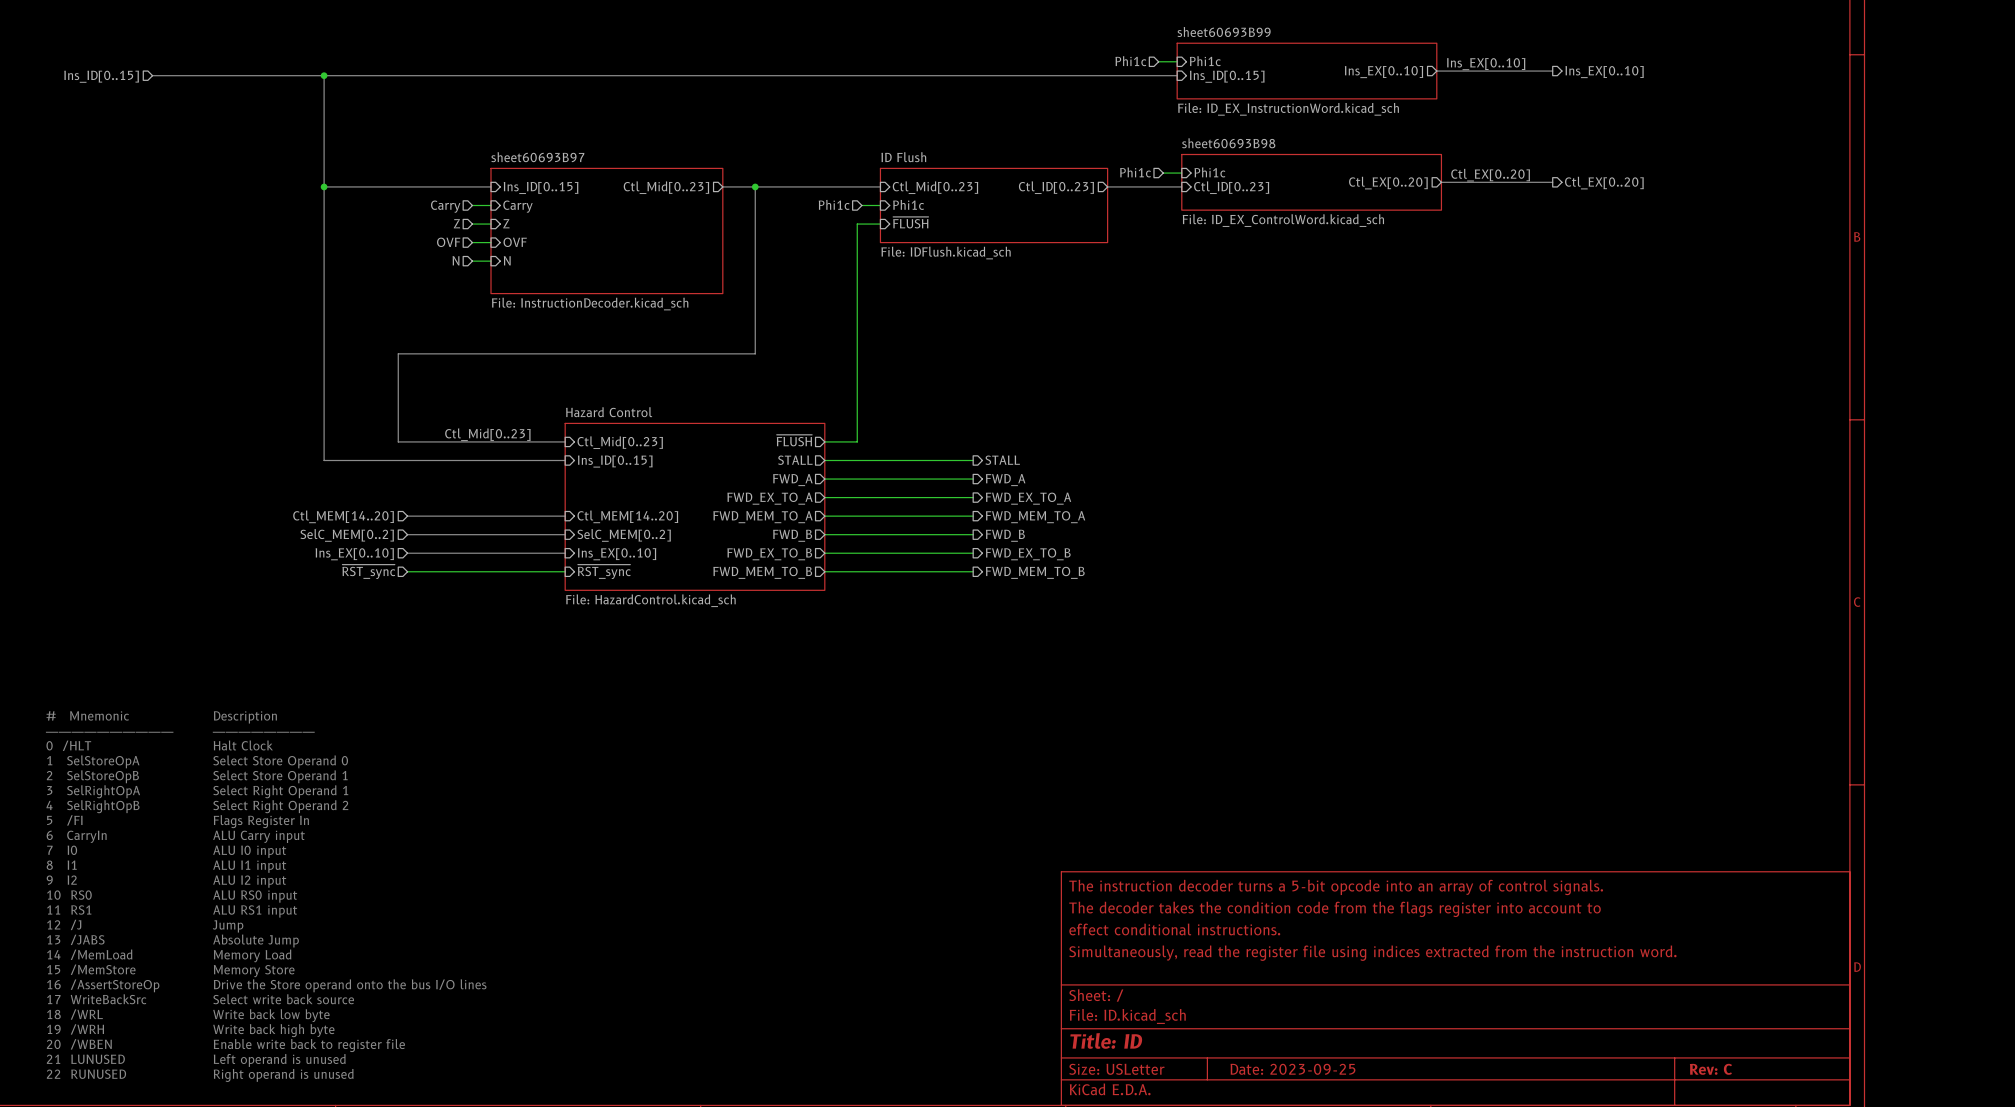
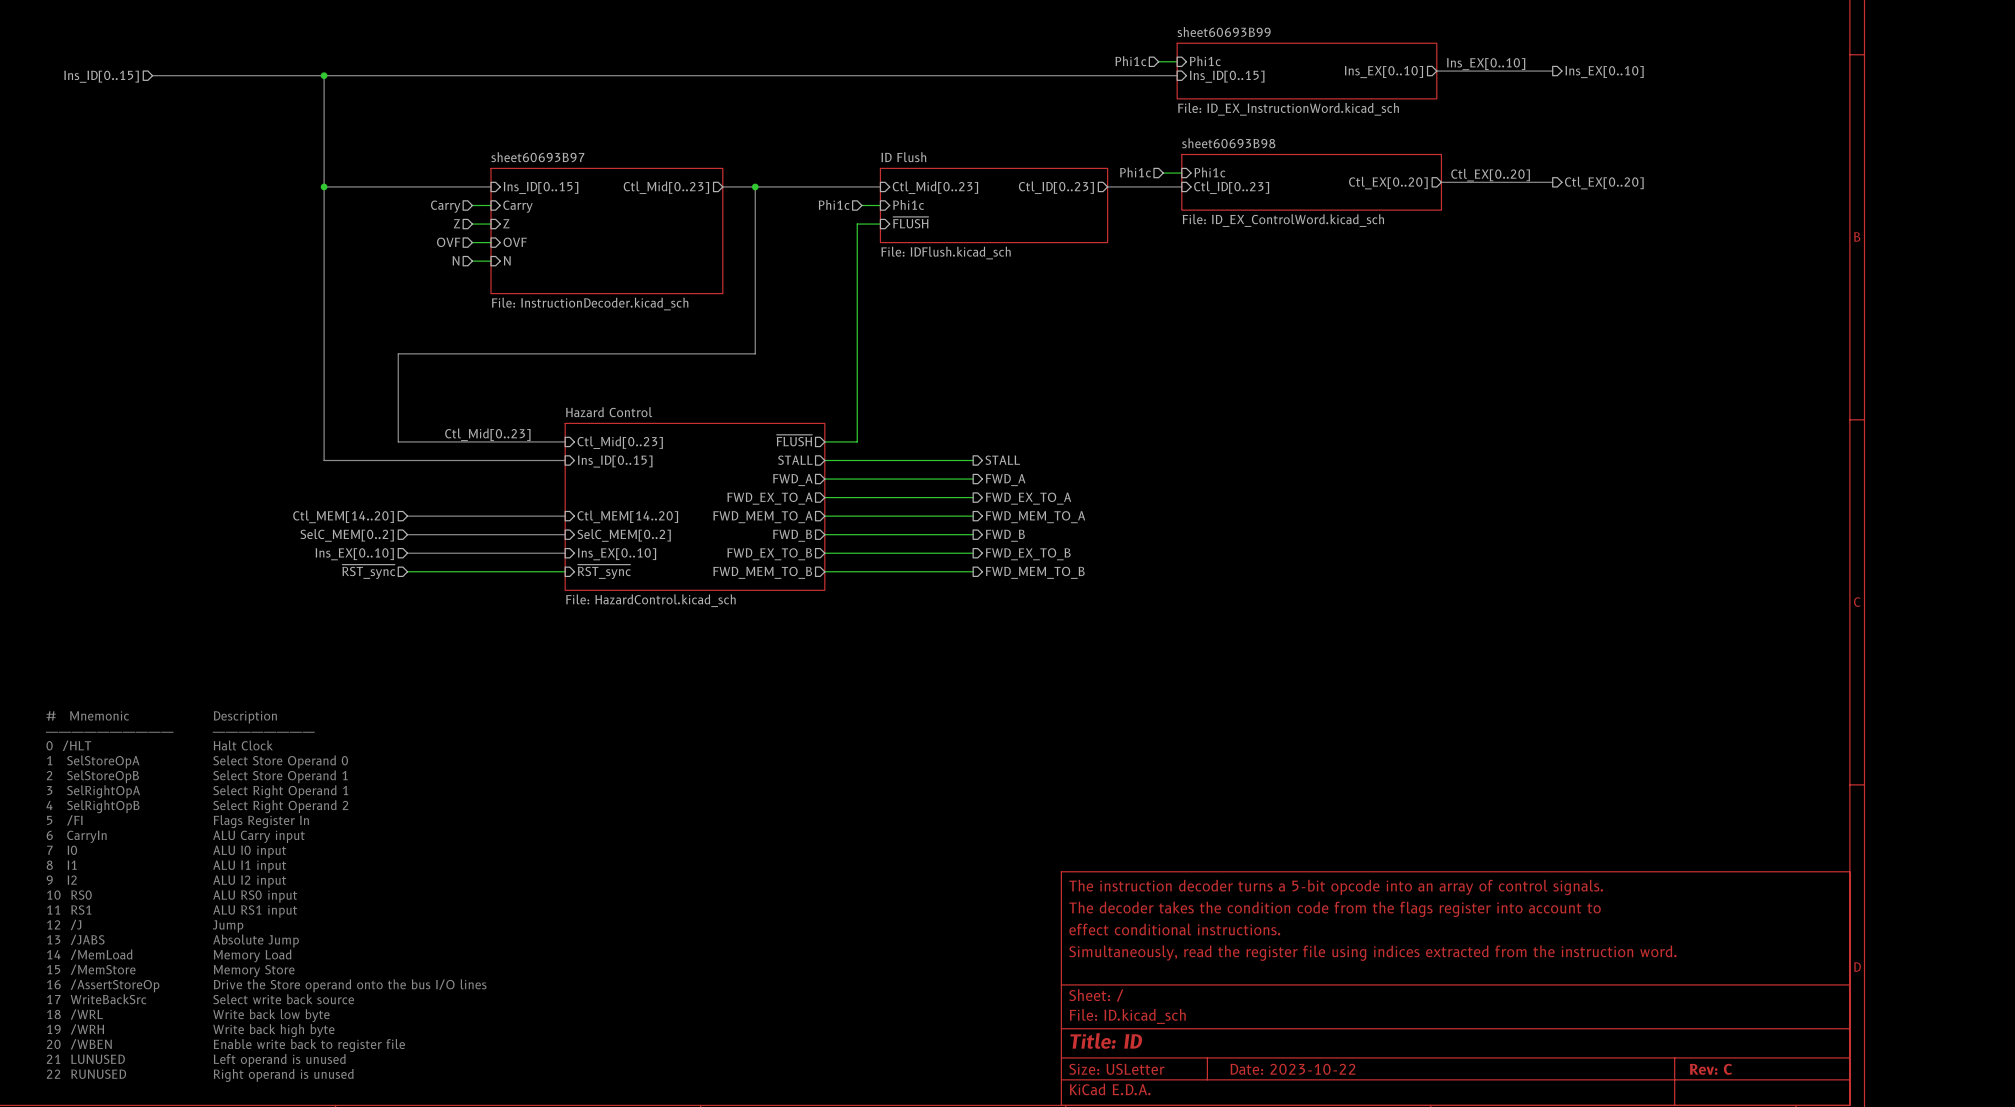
title block: Date: 2023-09-25 (1292, 1069) -> Date: 2023-10-22 (1292, 1069)

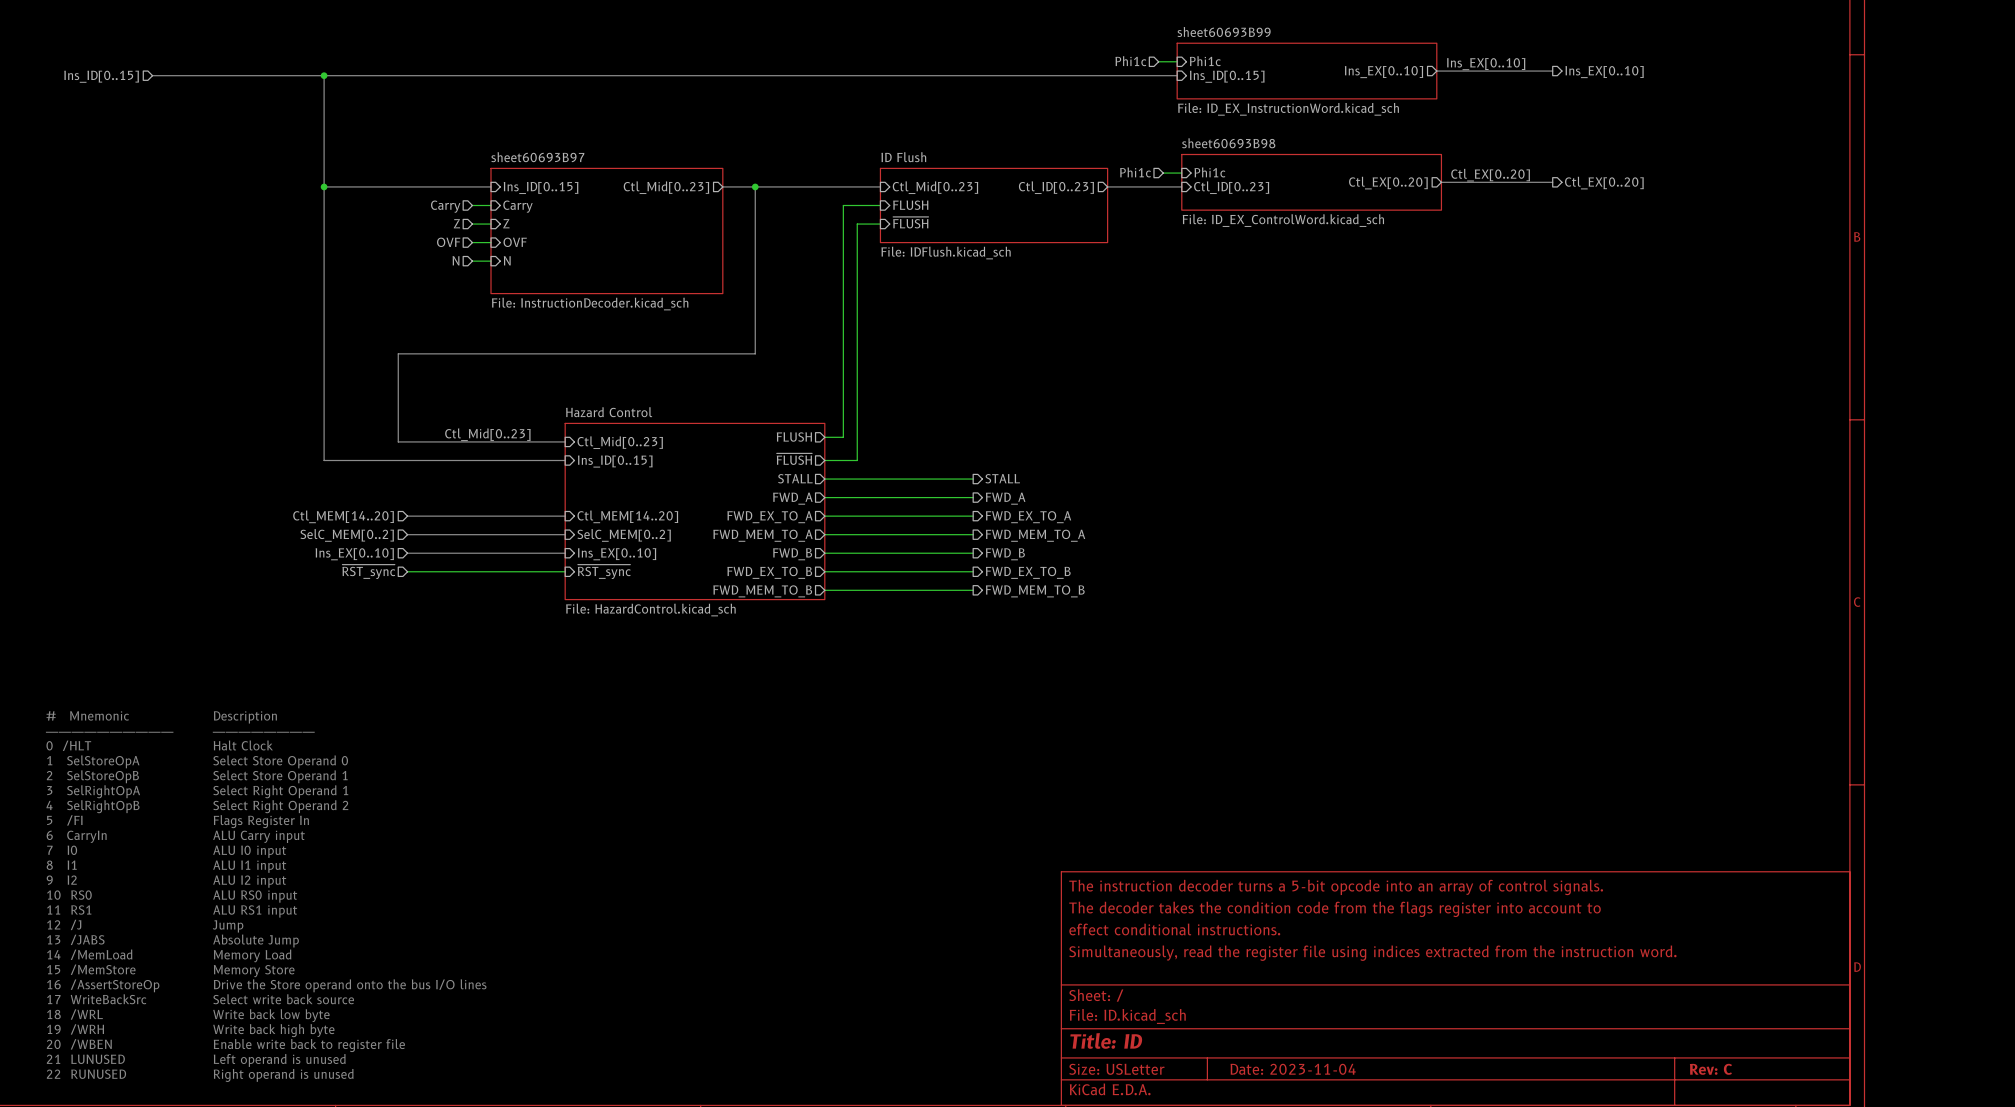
hierarchical label: Phi1c (834, 204) -> none
sheet pin: Phi1c (908, 204) -> FLUSH (910, 205)
wire: none -> (861, 205) (843, 205) (843, 437) (824, 437)
sheet Hazard Control shape: [565, 423, 825, 591] -> [565, 423, 825, 600]
sheet pin: ~{FLUSH} (794, 440) -> FLUSH (794, 437)
wire: (824, 441) (857, 441) -> (857, 460) (857, 441)
sheet pin: STALL (795, 460) -> ~{FLUSH} (794, 459)
wire: (857, 460) (973, 460) -> none
hierarchical label: STALL (1002, 460) -> none
sheet pin: FWD_A (792, 480) -> STALL (795, 478)
hierarchical label: FWD_A (1005, 480) -> STALL (1002, 478)
sheet pin: FWD_EX_TO_A (770, 498) -> FWD_A (792, 498)
hierarchical label: FWD_EX_TO_A (1028, 498) -> FWD_A (1005, 498)
sheet pin: FWD_MEM_TO_A (762, 517) -> FWD_EX_TO_A (770, 517)
hierarchical label: FWD_MEM_TO_A (1035, 517) -> FWD_EX_TO_A (1028, 517)
sheet pin: FWD_B (792, 535) -> FWD_MEM_TO_A (762, 535)
hierarchical label: FWD_B (1005, 535) -> FWD_MEM_TO_A (1035, 535)
sheet pin: FWD_EX_TO_B (769, 554) -> FWD_B (792, 554)
hierarchical label: FWD_EX_TO_B (1028, 554) -> FWD_B (1005, 554)
sheet pin: FWD_MEM_TO_B (762, 572) -> FWD_EX_TO_B (769, 572)
hierarchical label: FWD_MEM_TO_B (1035, 572) -> FWD_EX_TO_B (1028, 572)
wire: none -> (824, 590) (973, 590)
sheet pin: none -> FWD_MEM_TO_B (762, 591)
hierarchical label: none -> FWD_MEM_TO_B (1035, 591)
title block: Date: 2023-10-22 (1292, 1069) -> Date: 2023-11-04 (1293, 1069)

